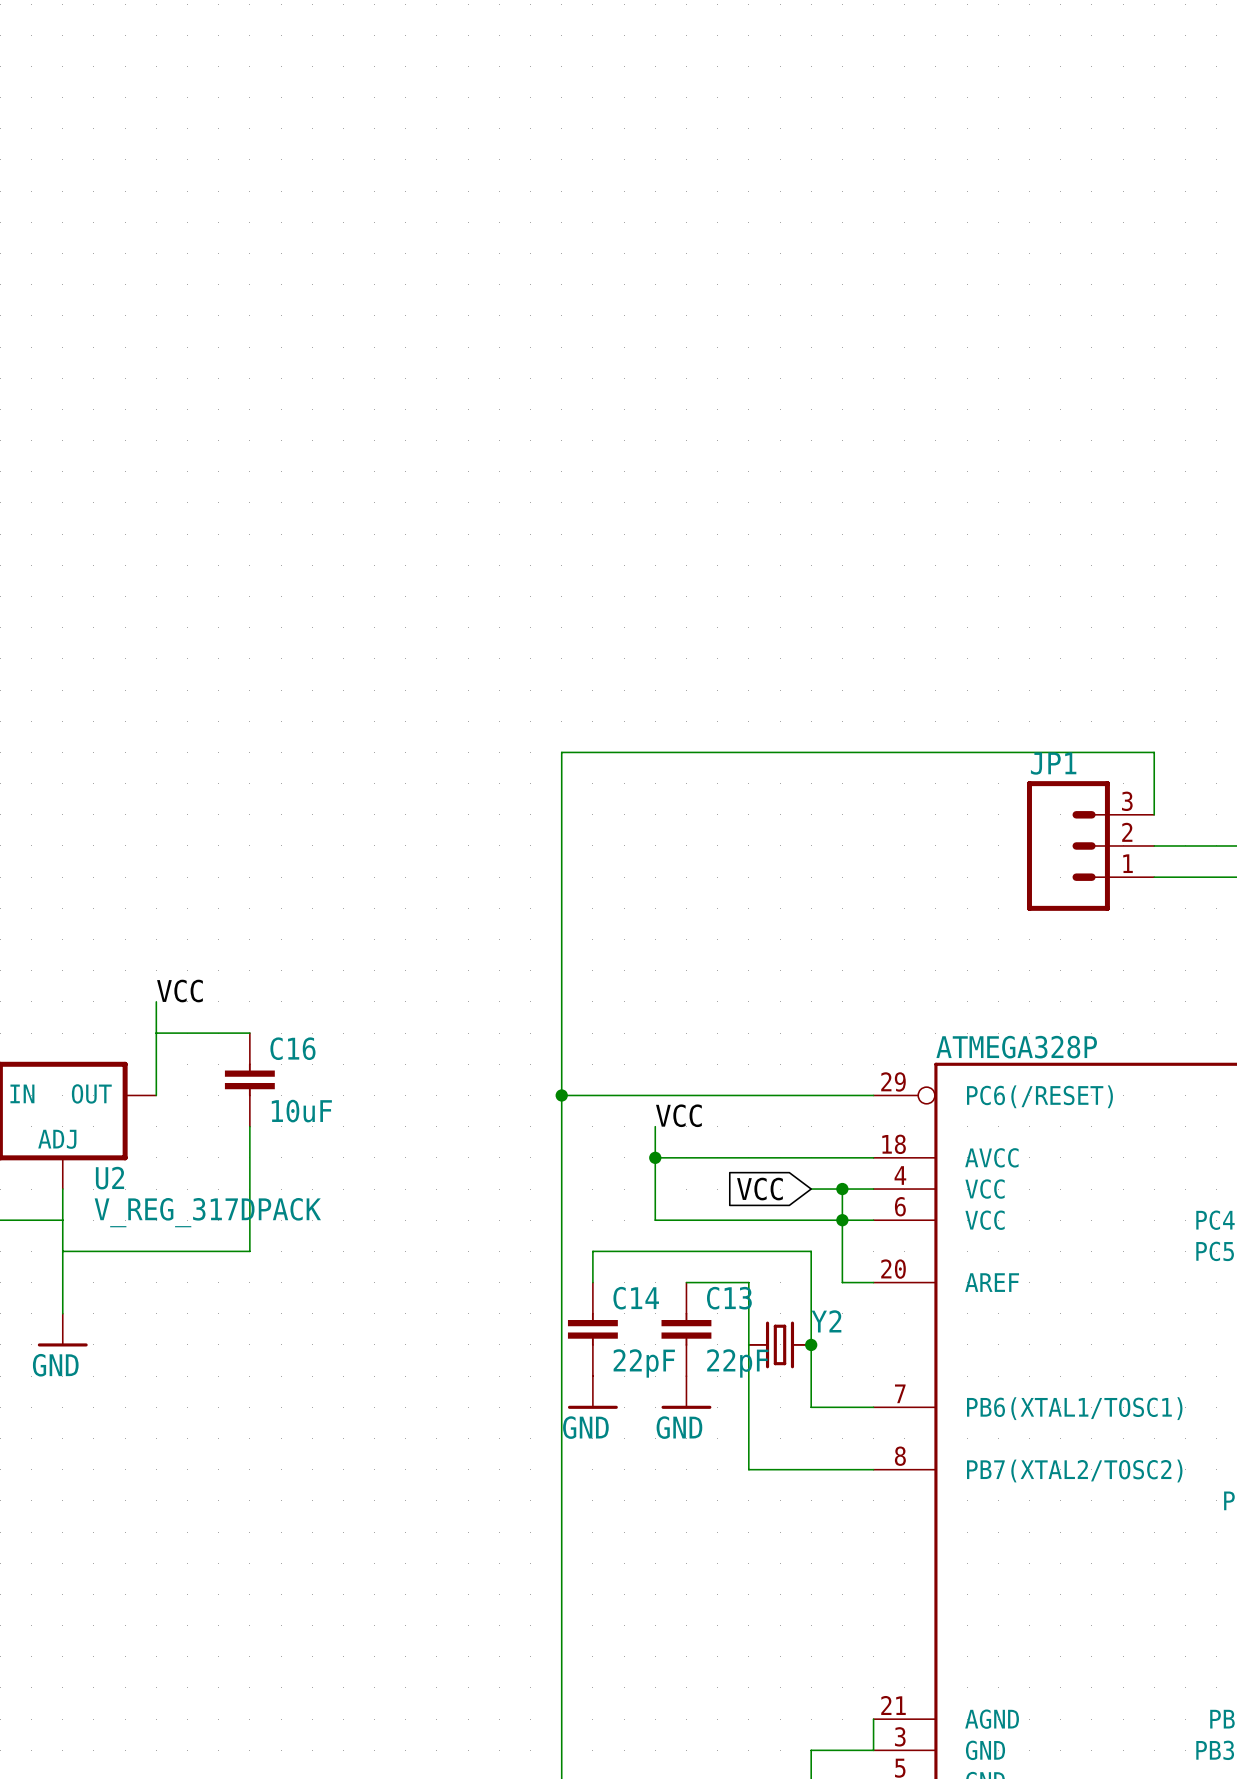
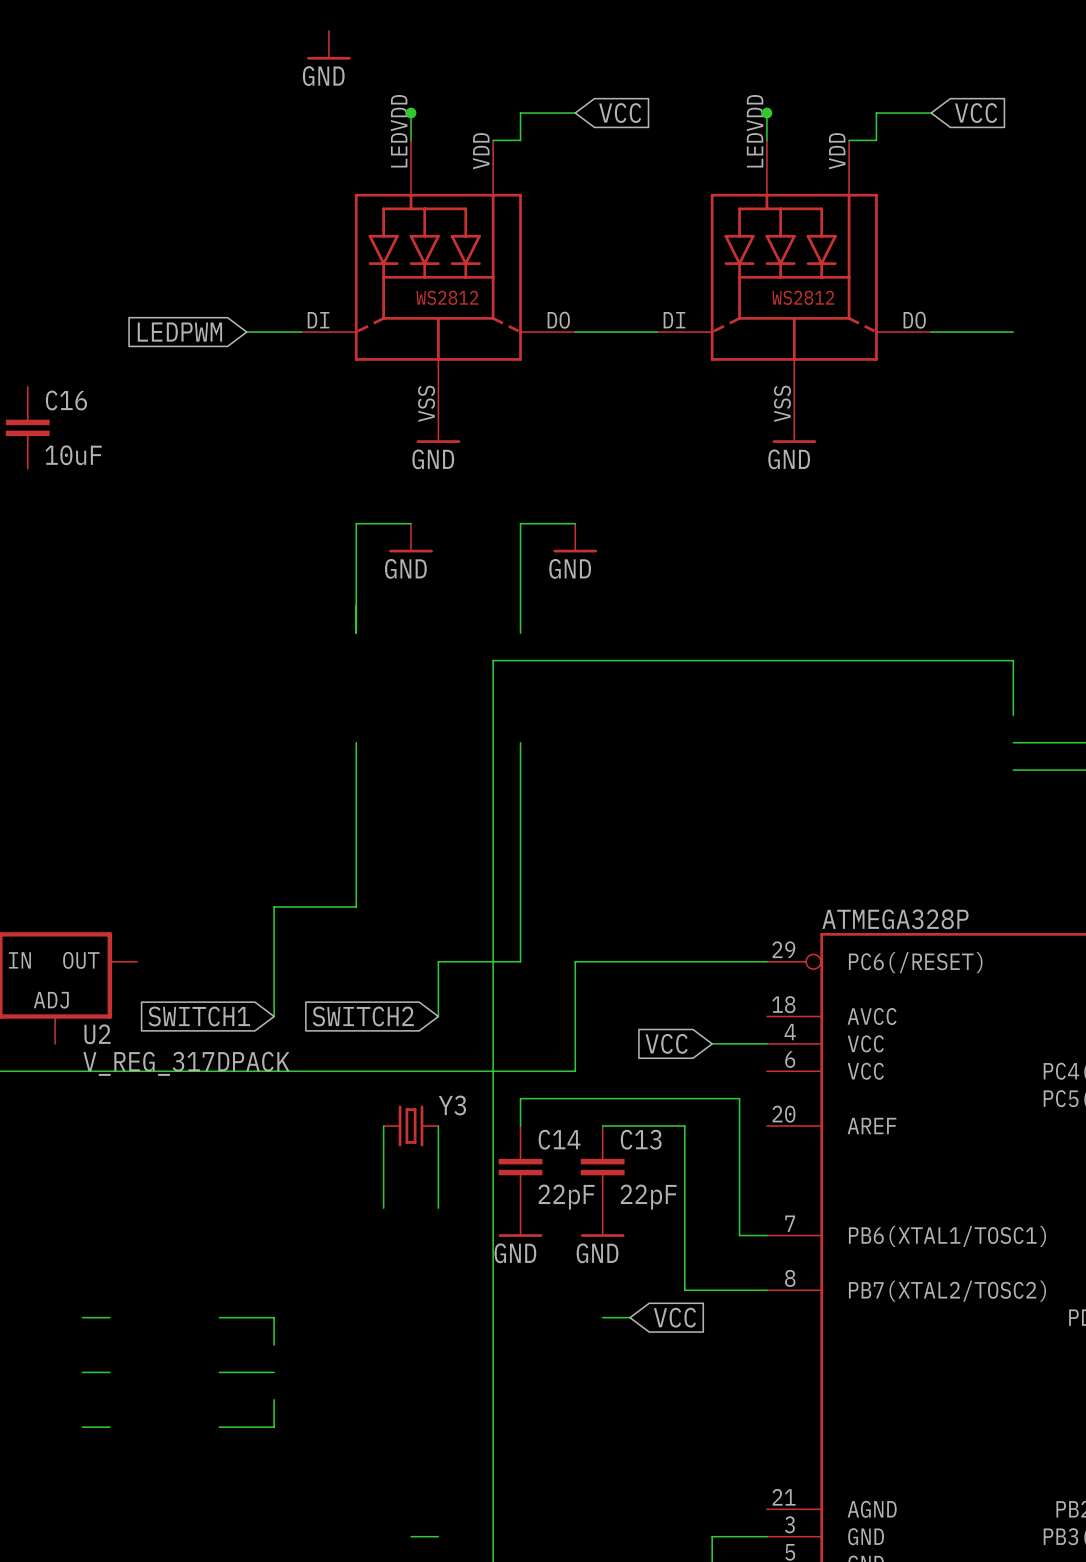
power symbol: none -> GND (328, 45)
wire: none -> (411, 113) (411, 140)
junction: none -> (411, 113)
wire: none -> (575, 113) (520, 113) (520, 140) (493, 140)
global label: none -> VCC (620, 113)
wire: none -> (766, 113) (766, 140)
junction: none -> (766, 113)
wire: none -> (931, 113) (876, 113) (876, 140) (849, 140)
global label: none -> VCC (976, 113)
part: none -> (438, 277)
part: none -> (794, 277)
global label: none -> LEDPWM (179, 332)
wire: none -> (246, 332) (301, 332)
wire: none -> (575, 332) (657, 332)
wire: none -> (931, 332) (1013, 332)
power symbol: none -> GND (438, 428)
power symbol: none -> GND (794, 428)
wire: none -> (411, 523) (356, 523) (356, 633)
wire: none -> (575, 523) (520, 523) (520, 633)
power symbol: none -> GND (411, 538)
power symbol: none -> GND (575, 538)
wire: none -> (356, 742) (356, 906) (274, 906) (274, 1016)
wire: none -> (520, 742) (520, 961)
JP1: (1090, 845) -> none
label: VCC (179, 991) -> none
wire: (156, 1001) (156, 1095) -> none
wire: (156, 1033) (249, 1033) -> none
C16 position: (249, 1079) -> (27, 427)
wire: none -> (493, 961) (438, 961) (438, 1016)
junction: (561, 1095) -> none
wire: (592, 1095) (655, 1095) -> (575, 989) (575, 961)
label: VCC (678, 1115) -> none
wire: (249, 1126) (249, 1251) (62, 1251) -> none
global label: none -> SWITCH1 (199, 1016)
global label: none -> SWITCH2 (363, 1016)
wire: (655, 1157) (873, 1157) -> none
junction: (655, 1157) -> none
wire: (62, 1189) (62, 1313) -> none
wire: (842, 1189) (842, 1251) -> (712, 1098) (739, 1098)
junction: (842, 1189) -> none
wire: (655, 1220) (873, 1220) -> (575, 1071) (55, 1071)
junction: (842, 1220) -> none
wire: (811, 1251) (811, 1407) (842, 1407) -> (739, 1126) (739, 1235)
wire: none -> (383, 1126) (383, 1208)
Y3: none -> (411, 1126)
wire: none -> (438, 1126) (438, 1208)
wire: (748, 1282) (748, 1469) (780, 1469) -> (657, 1126) (684, 1126) (684, 1290)
wire: (842, 1282) (873, 1282) -> (602, 1317) (630, 1317)
power symbol: GND (62, 1330) -> none
Y2: (780, 1344) -> none
junction: (811, 1344) -> none
wire: none -> (82, 1317) (109, 1317)
wire: none -> (219, 1317) (274, 1317) (274, 1345)
global label: none -> VCC (674, 1317)
wire: none -> (82, 1372) (109, 1372)
wire: none -> (219, 1372) (274, 1372)
wire: none -> (274, 1399) (274, 1427) (219, 1427)
wire: none -> (82, 1427) (109, 1427)
wire: (873, 1719) (873, 1750) -> none
wire: none -> (411, 1536) (438, 1536)

